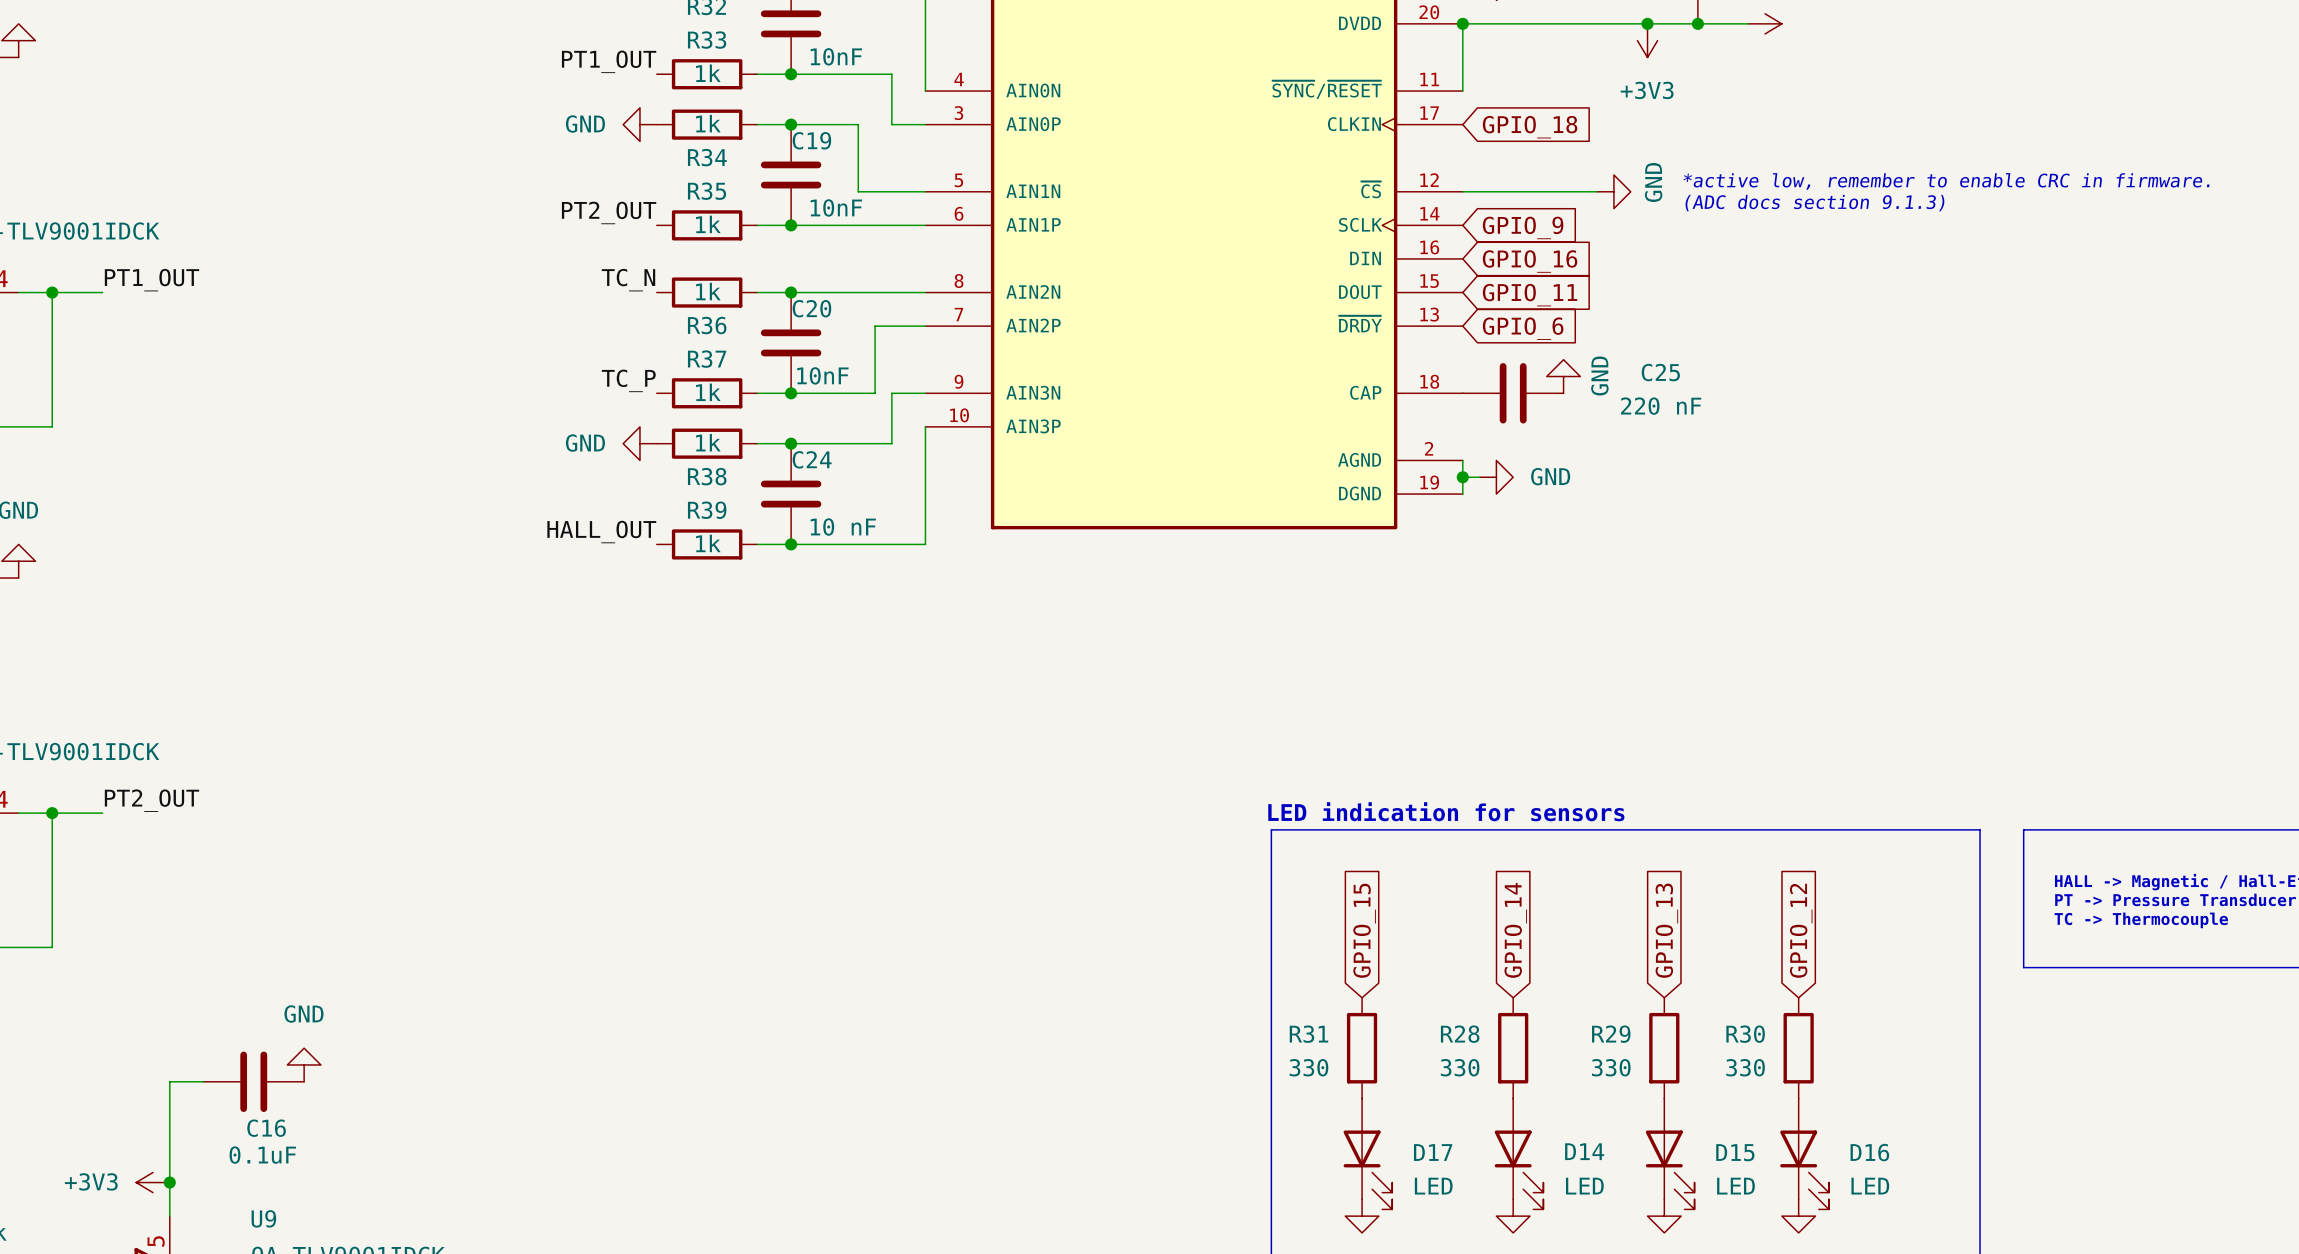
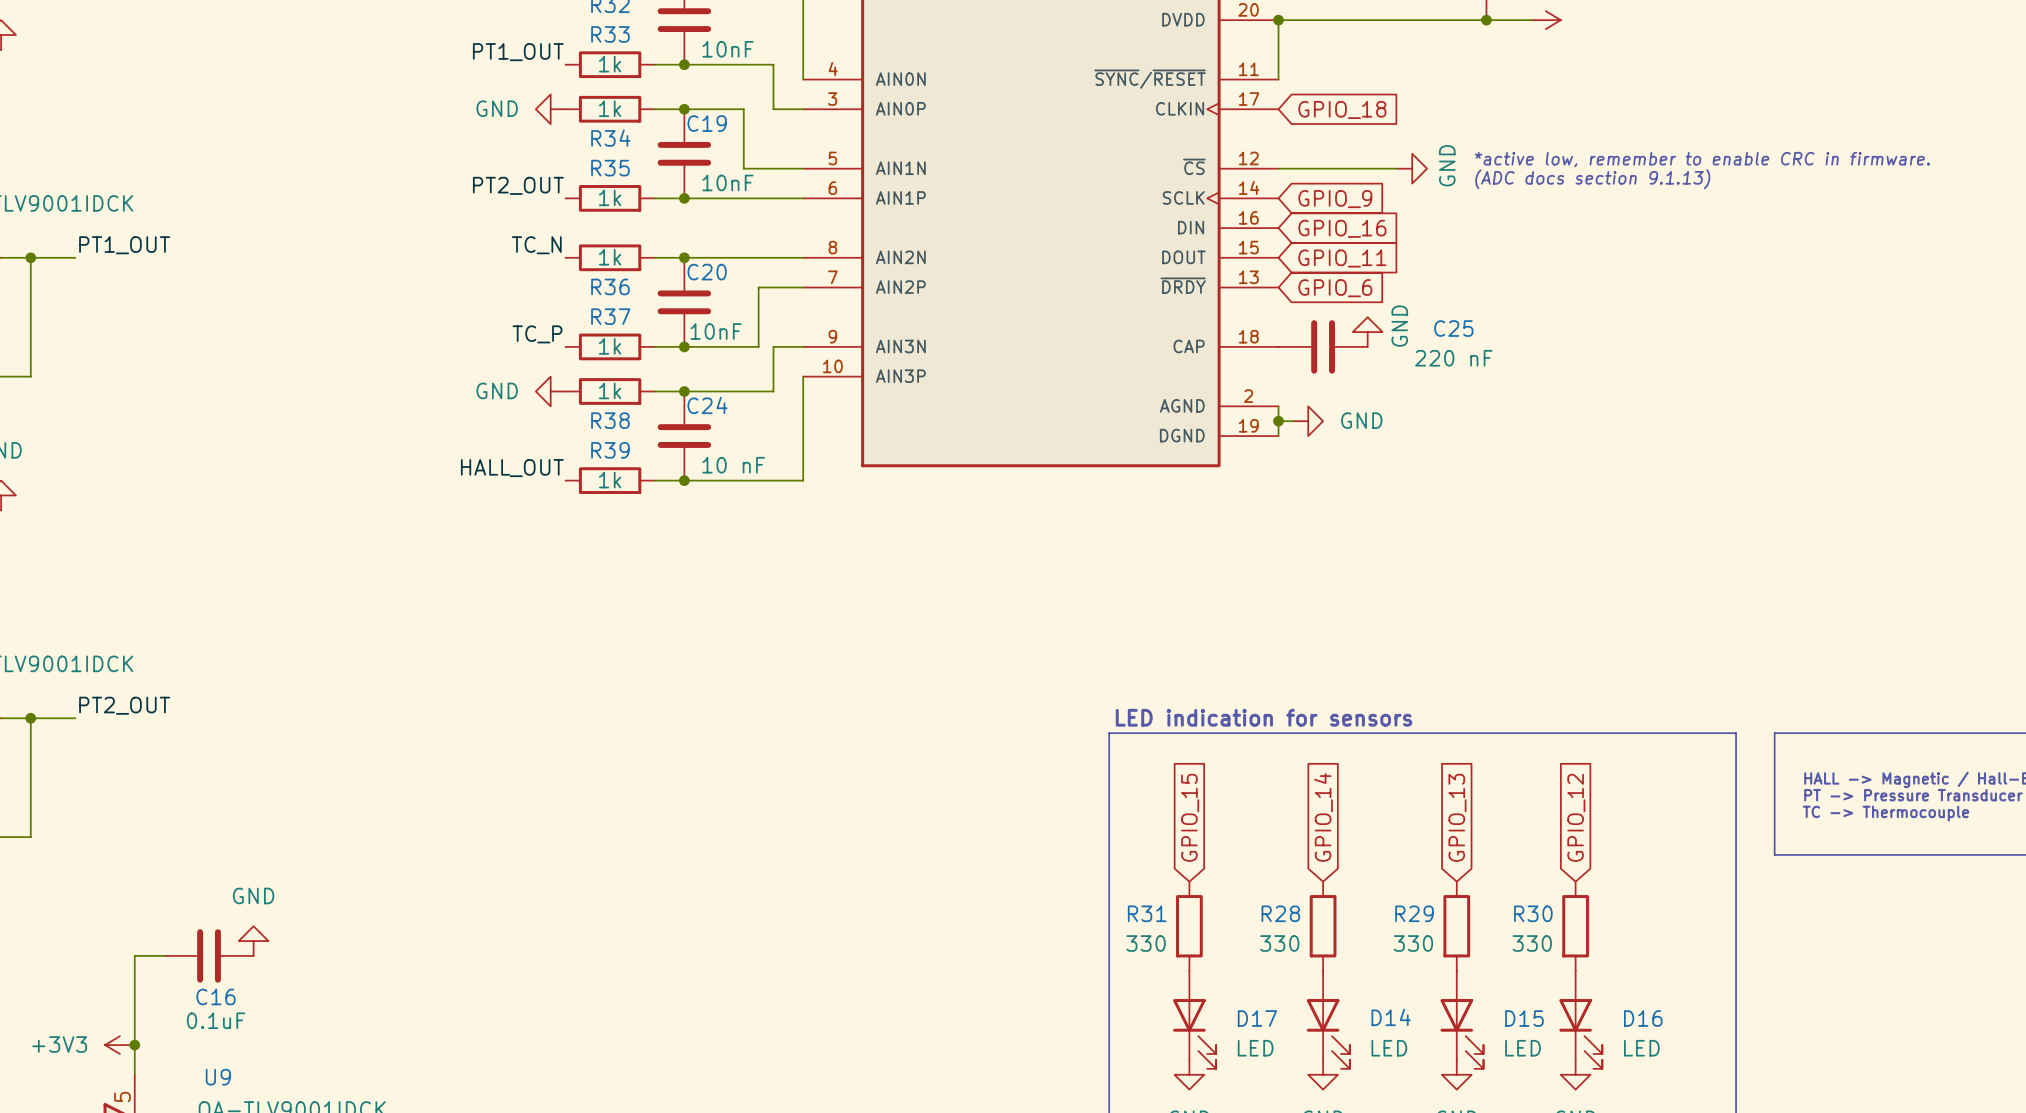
junction: (1647, 23) -> none
power symbol: +3V3 (1647, 40) -> none
text: (ADC docs section 9.1.3) (1814, 203) -> (ADC docs section 9.1.13) (1592, 179)

